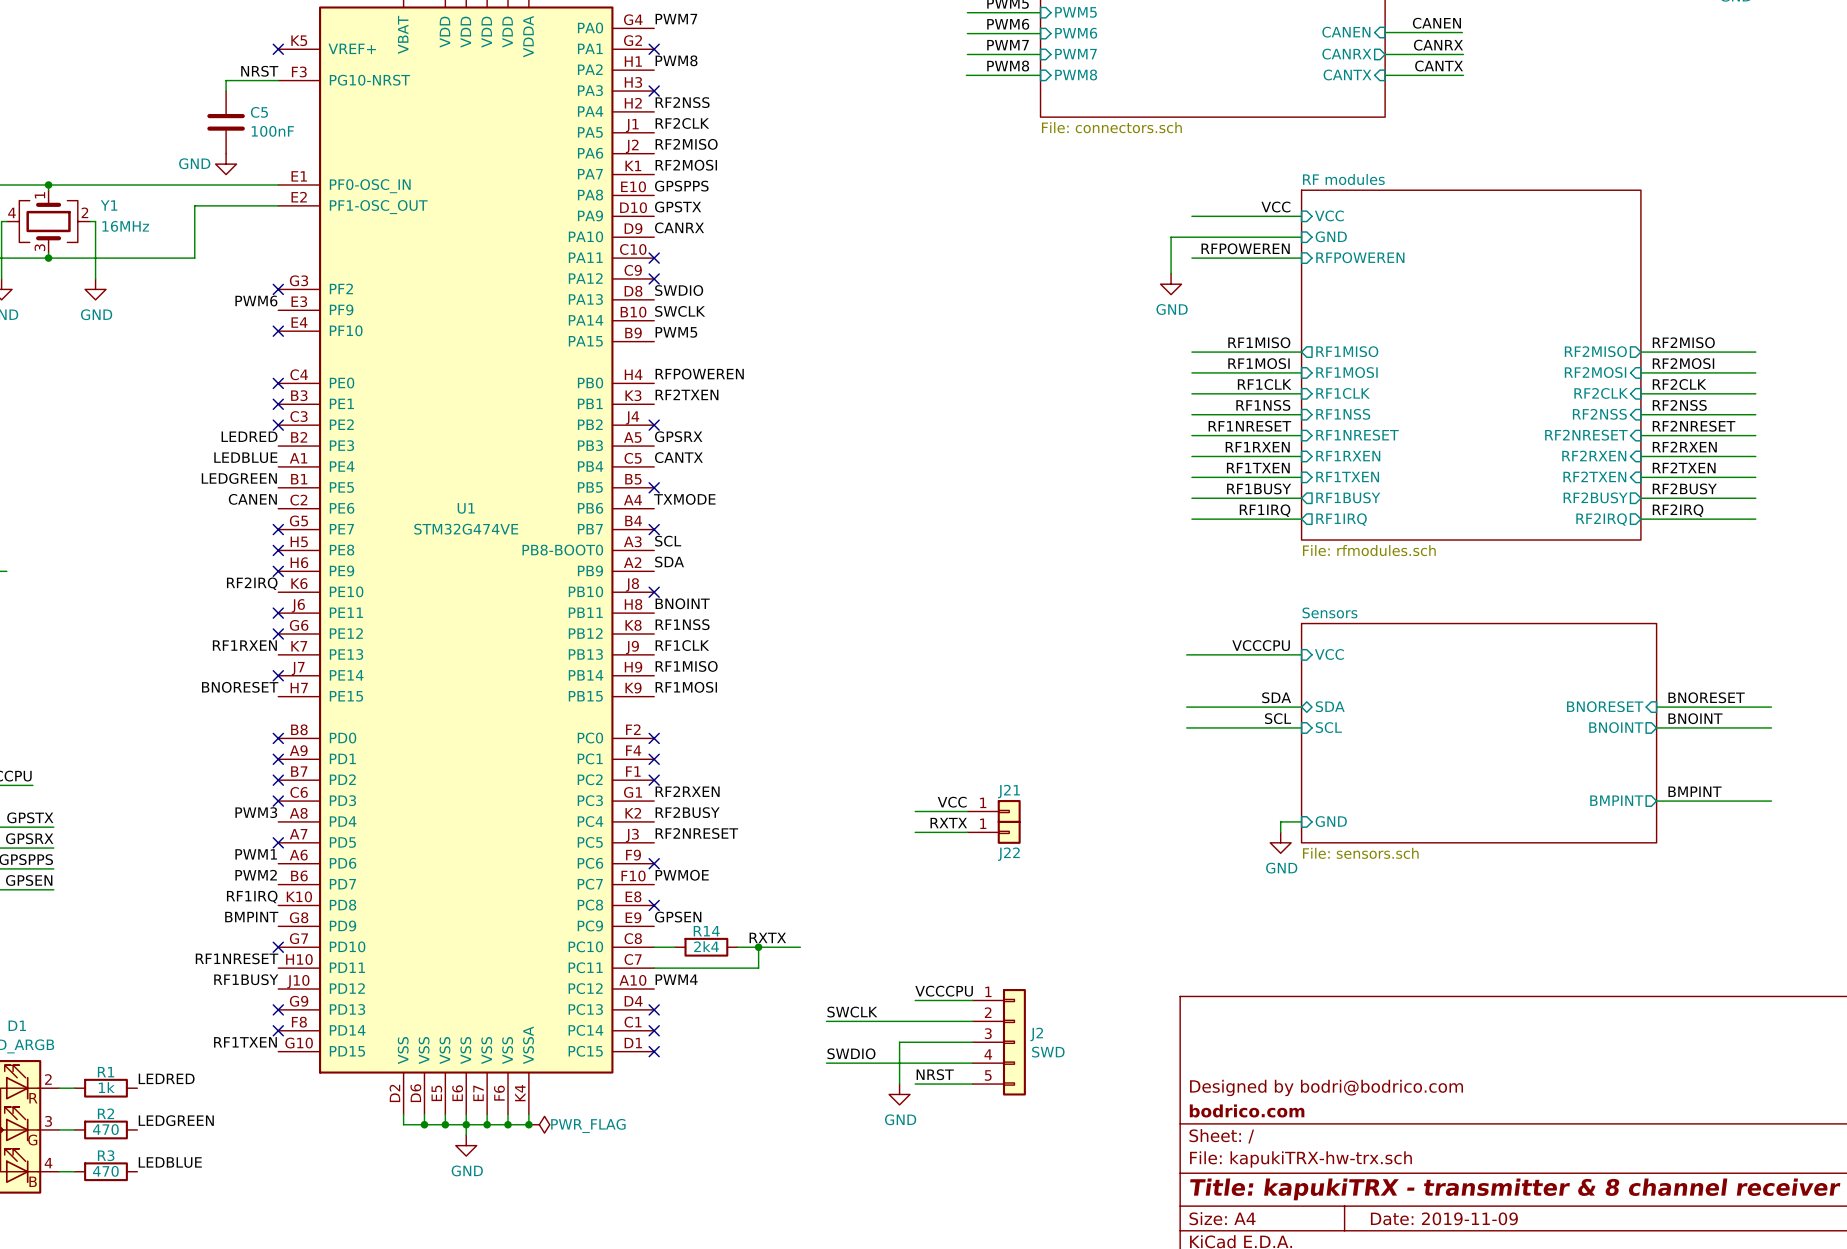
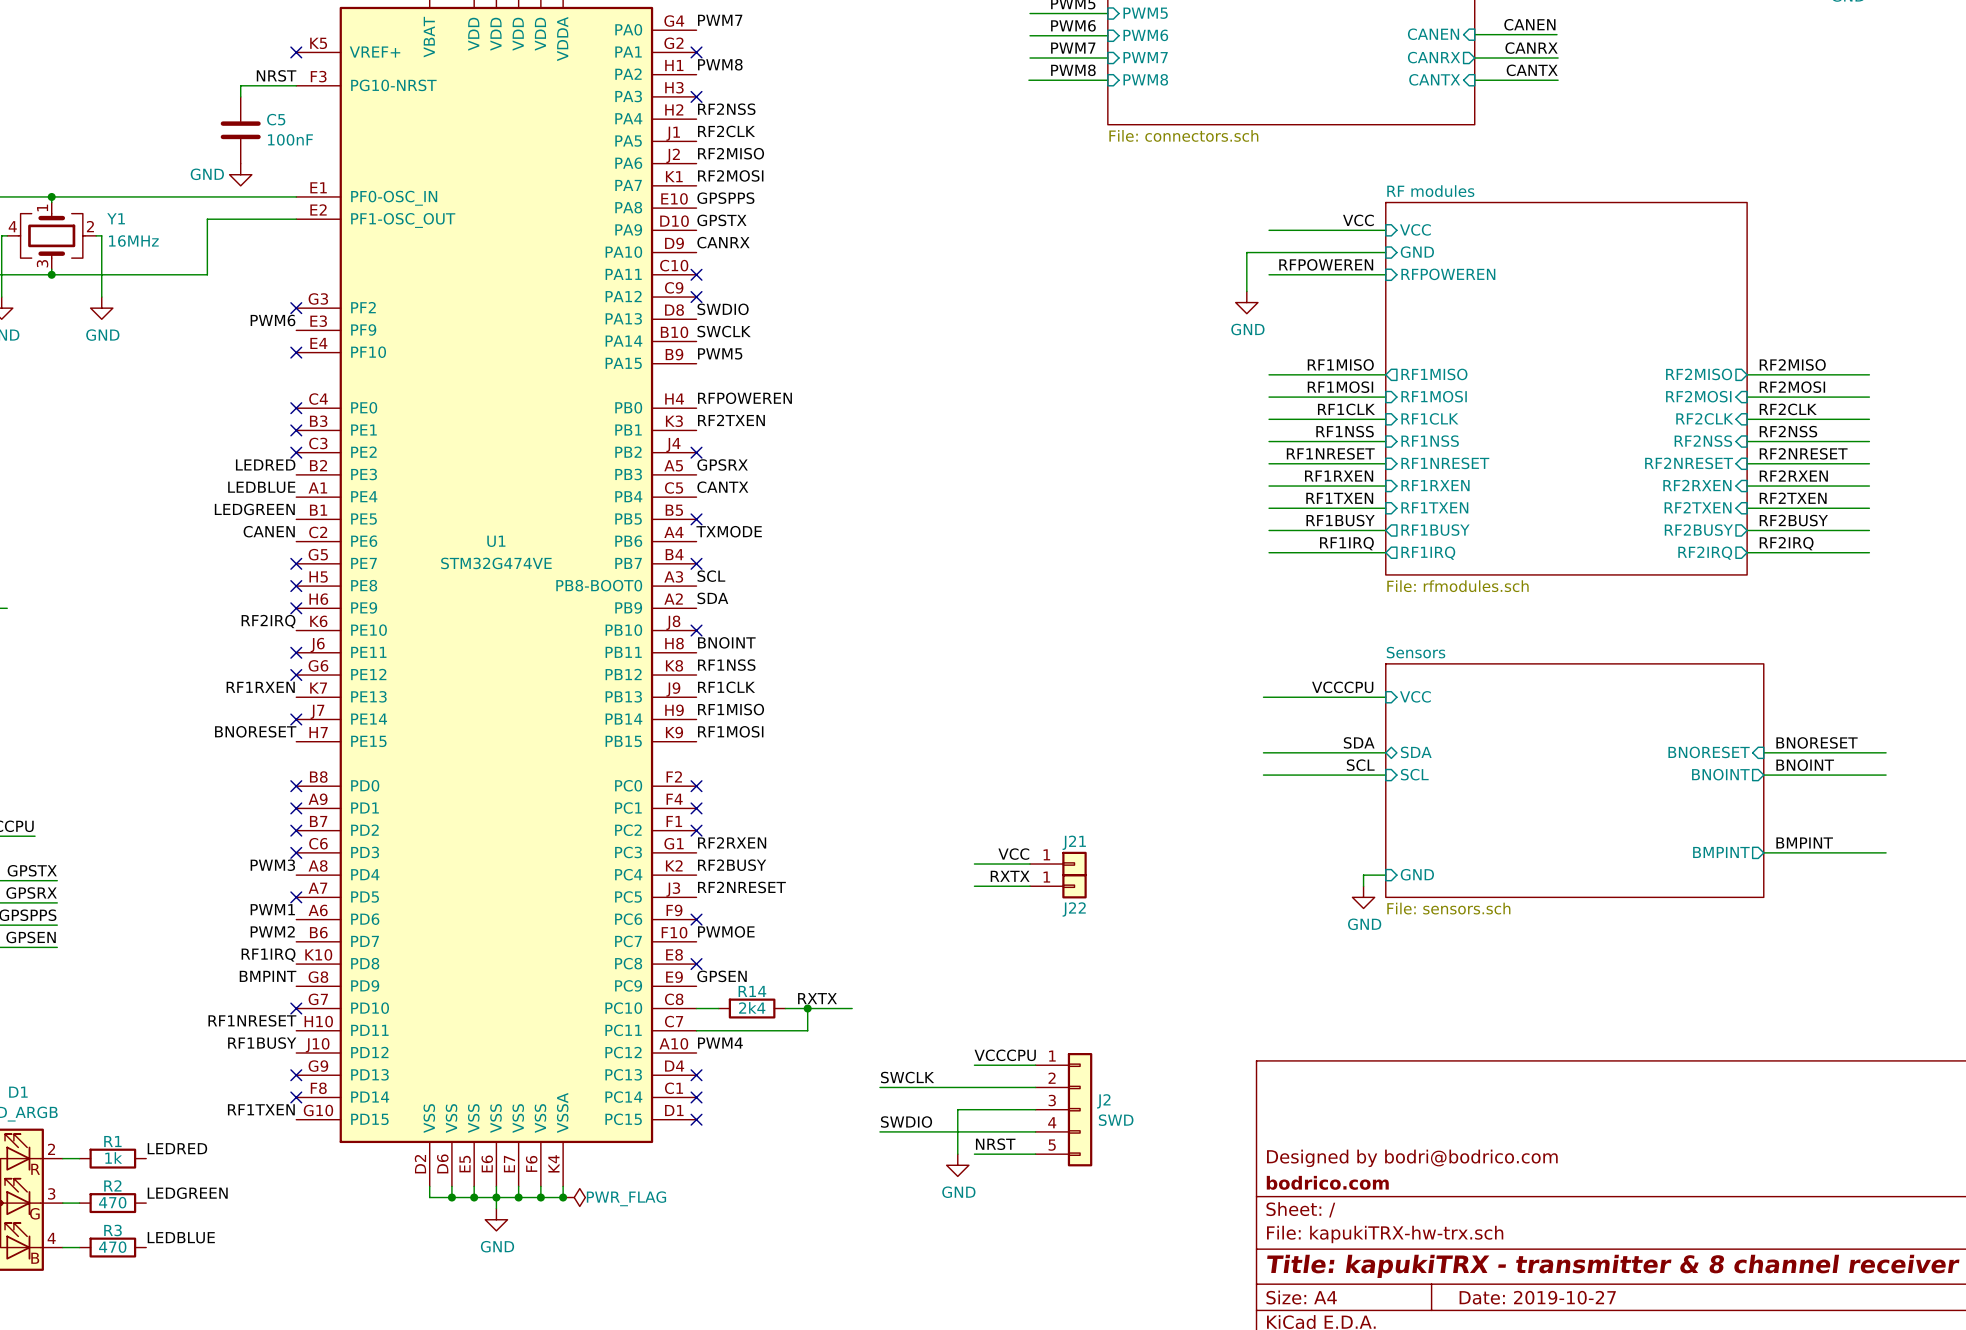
title block: Date: 2019-11-09 (1444, 1218) -> Date: 2019-10-27 (1537, 1297)

